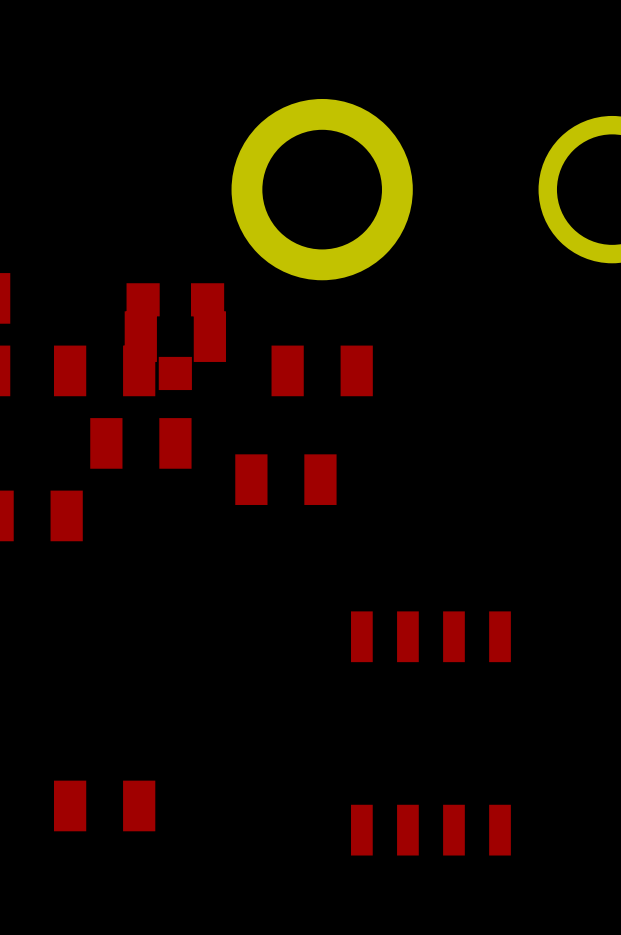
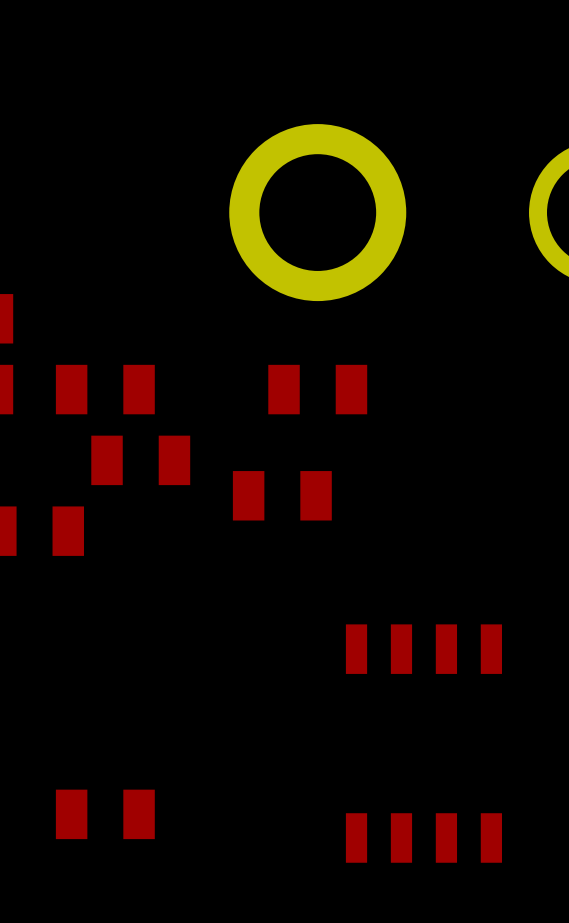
part: (175, 336) -> none
part: (175, 336) -> none

